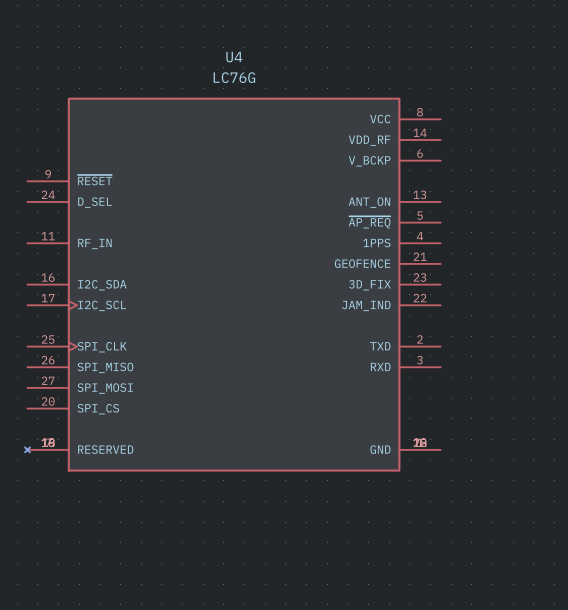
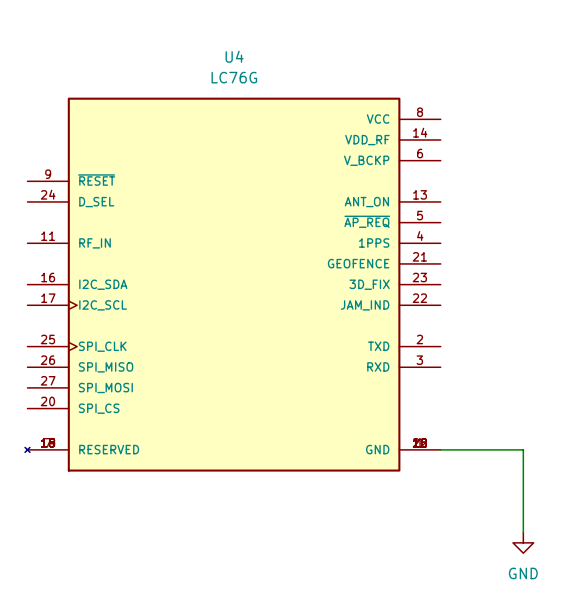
wire: none -> (440, 449) (523, 449) (523, 532)
power symbol: none -> GND (523, 542)

